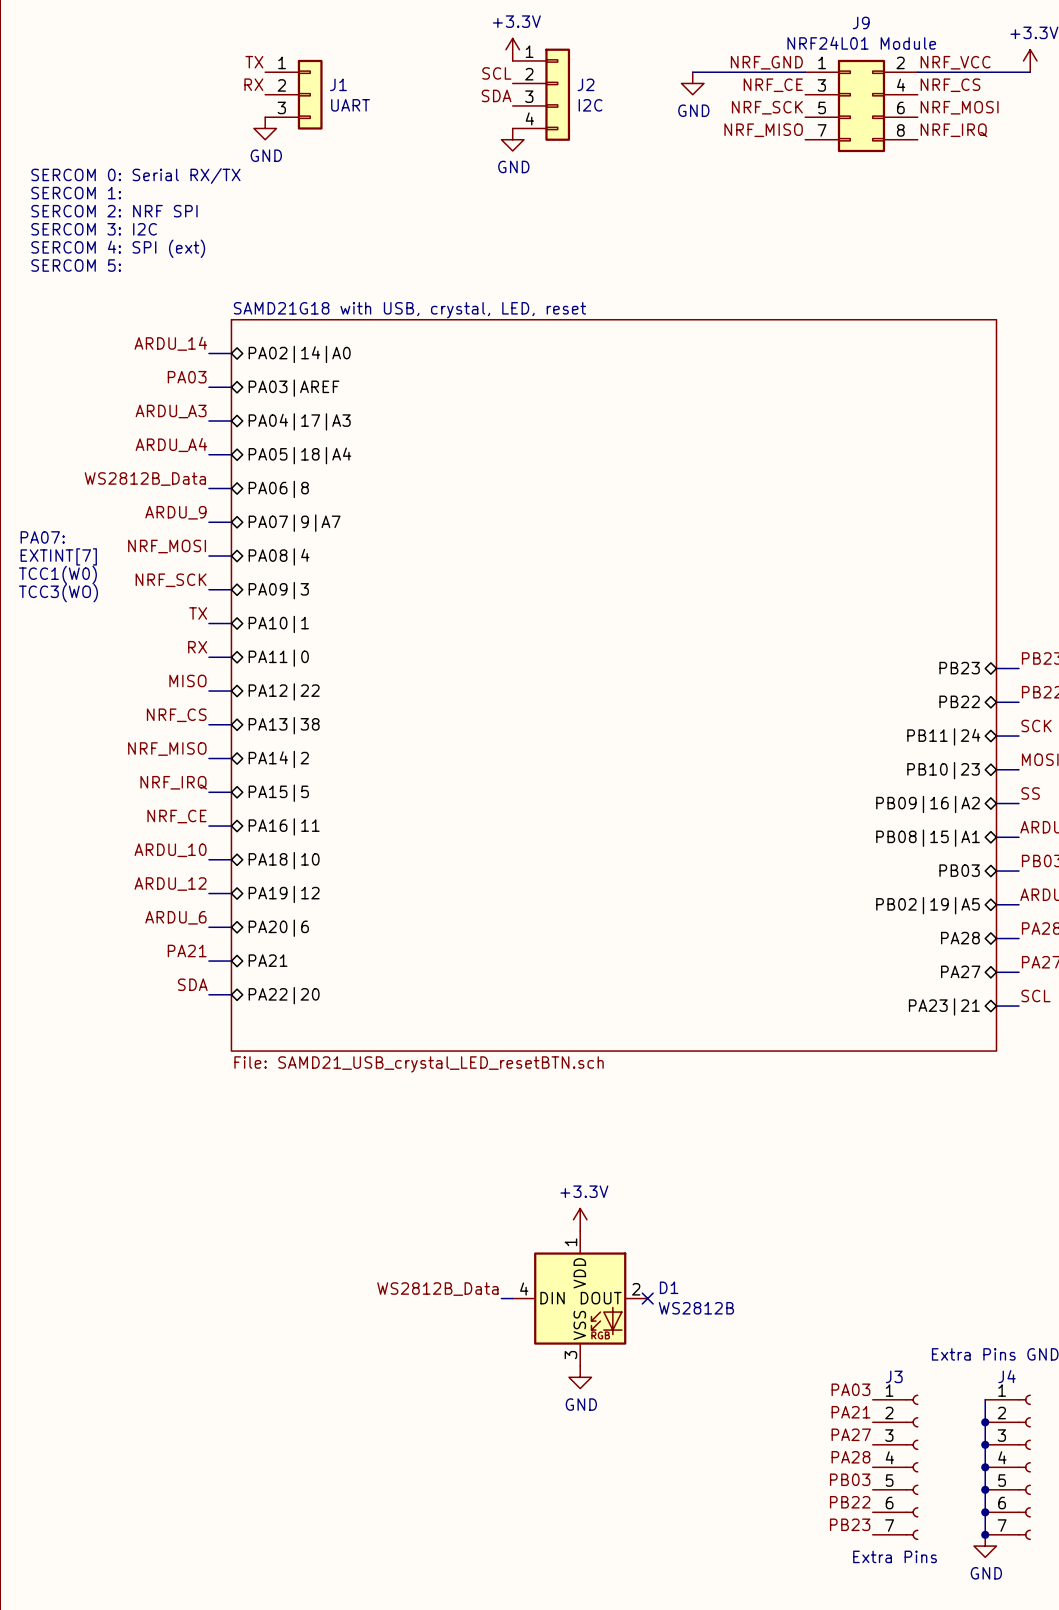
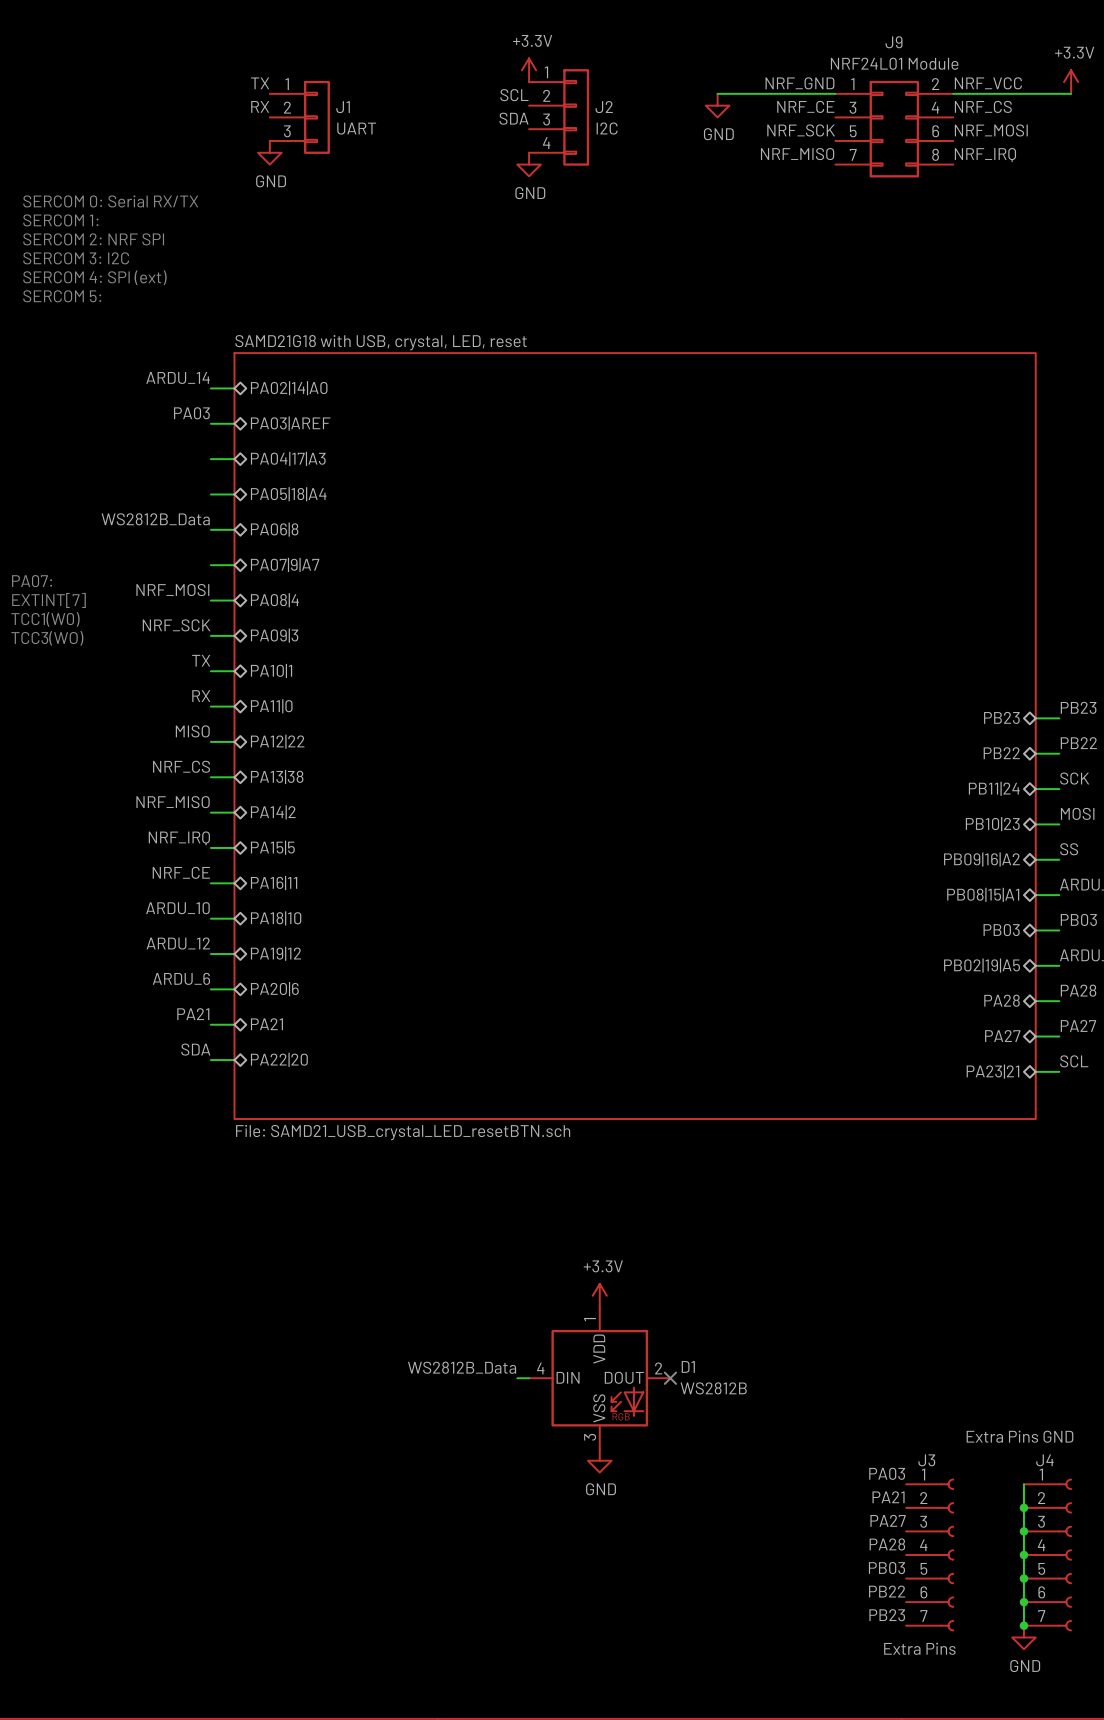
label: ARDU_A3 (171, 411) -> none
label: ARDU_A4 (171, 444) -> none
label: ARDU_9 (175, 512) -> none

